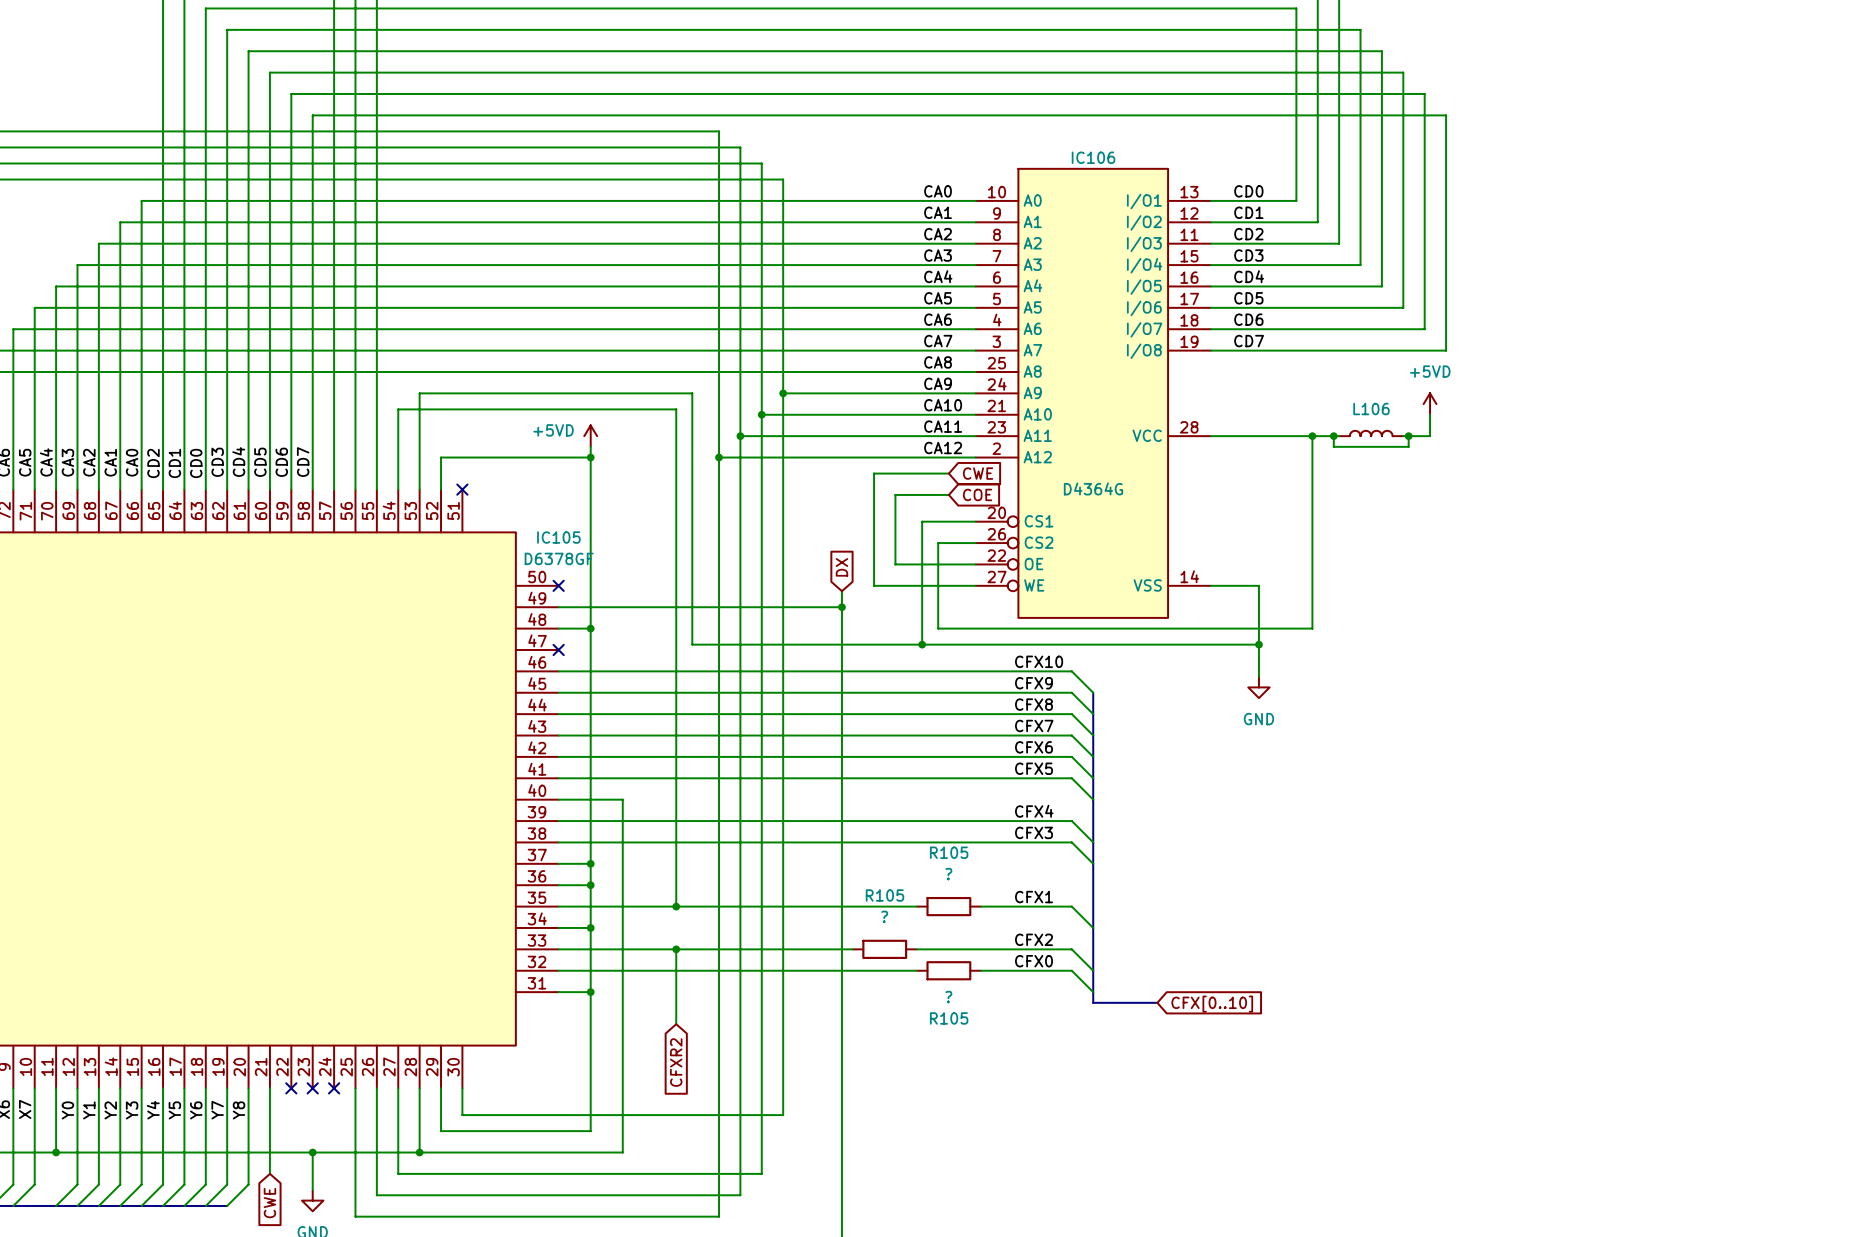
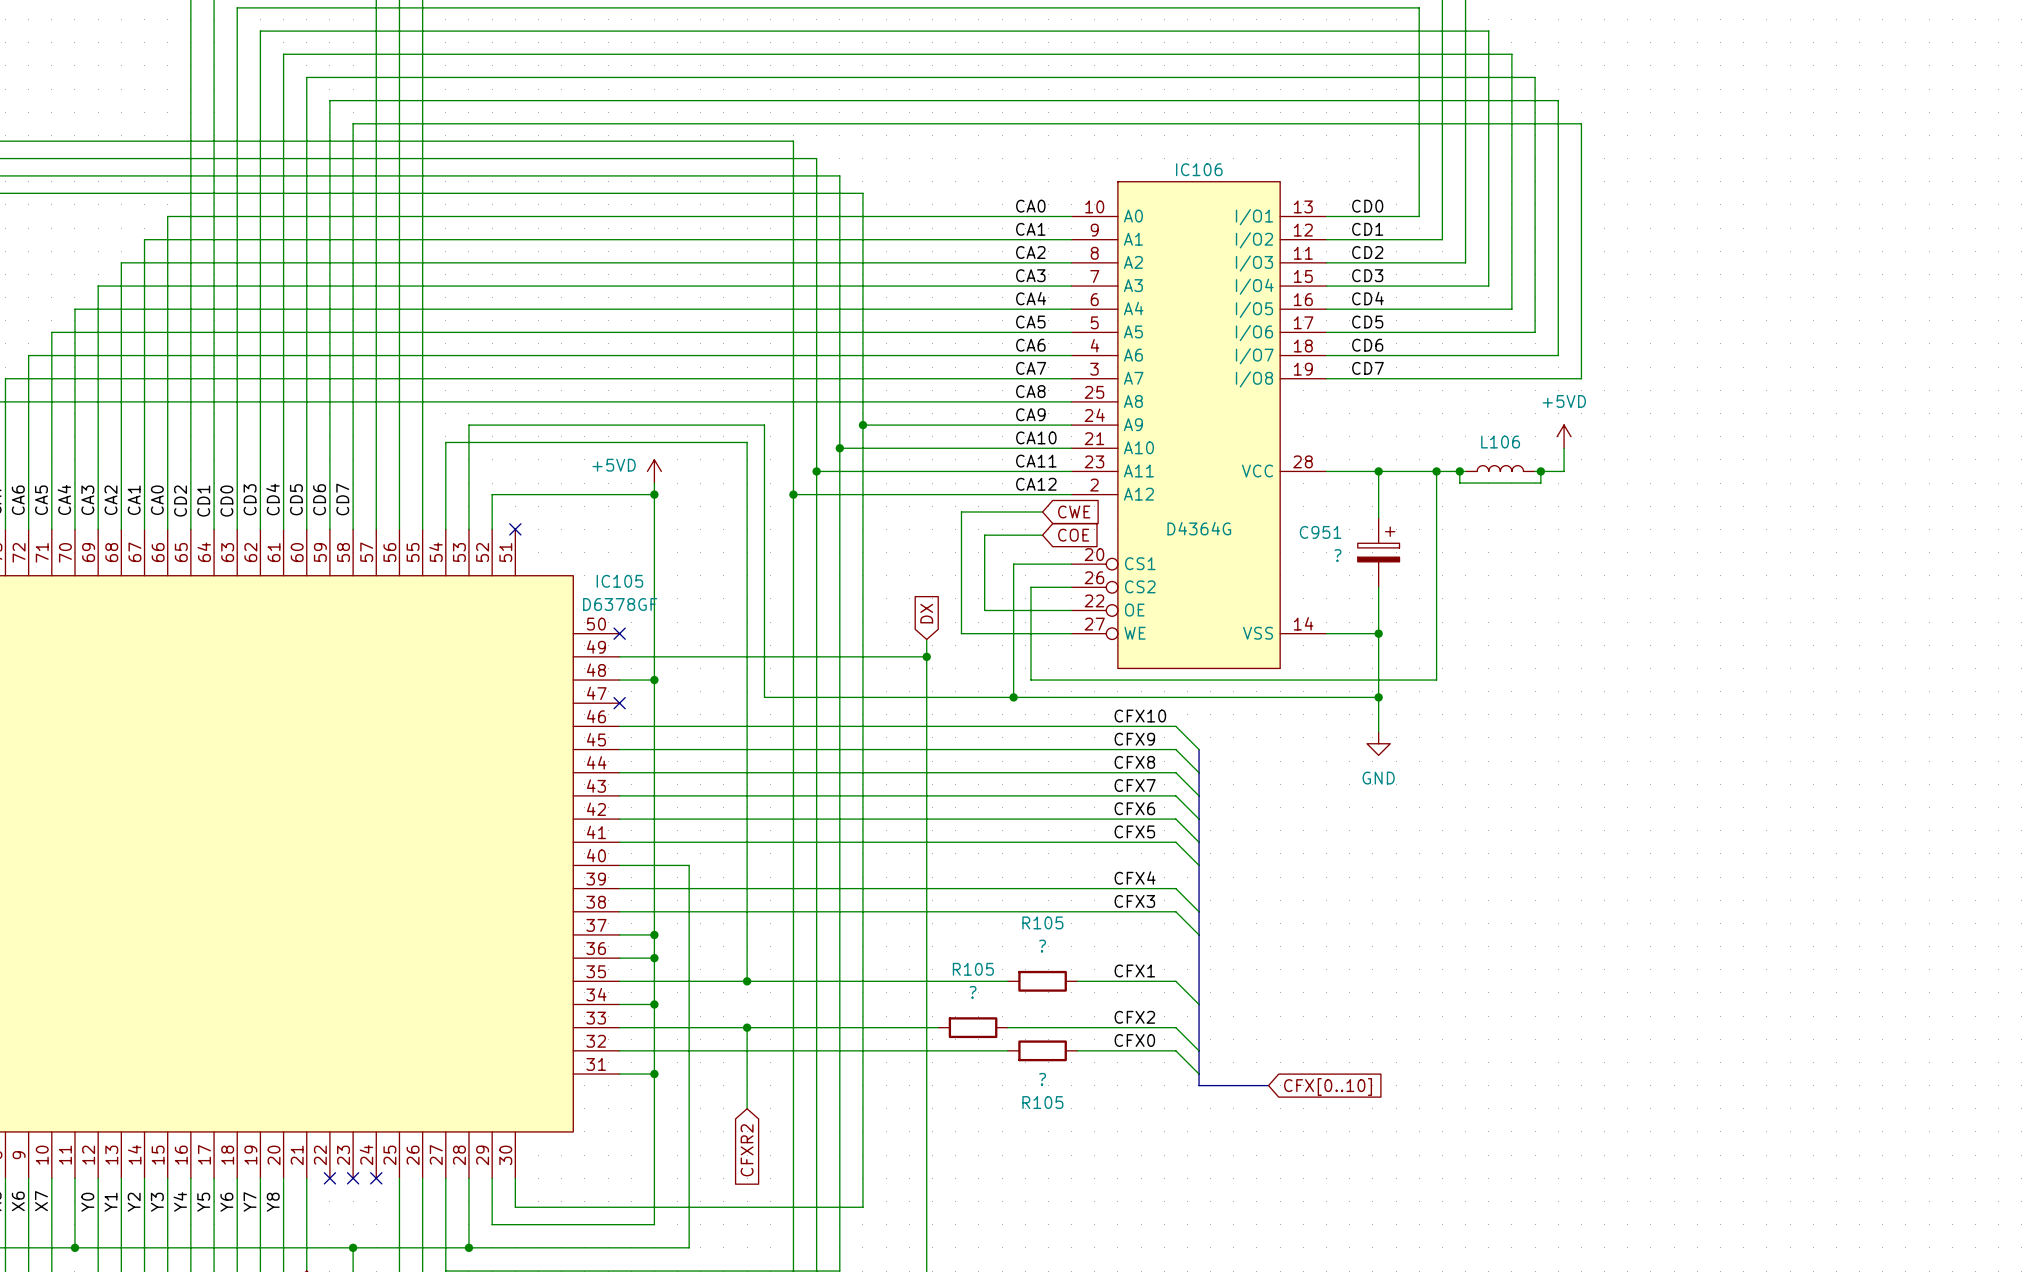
wire: none -> (1378, 471) (1378, 517)
junction: none -> (1378, 471)
C951: none -> ? (1378, 552)
wire: none -> (1378, 587) (1378, 633)
junction: none -> (1378, 633)

